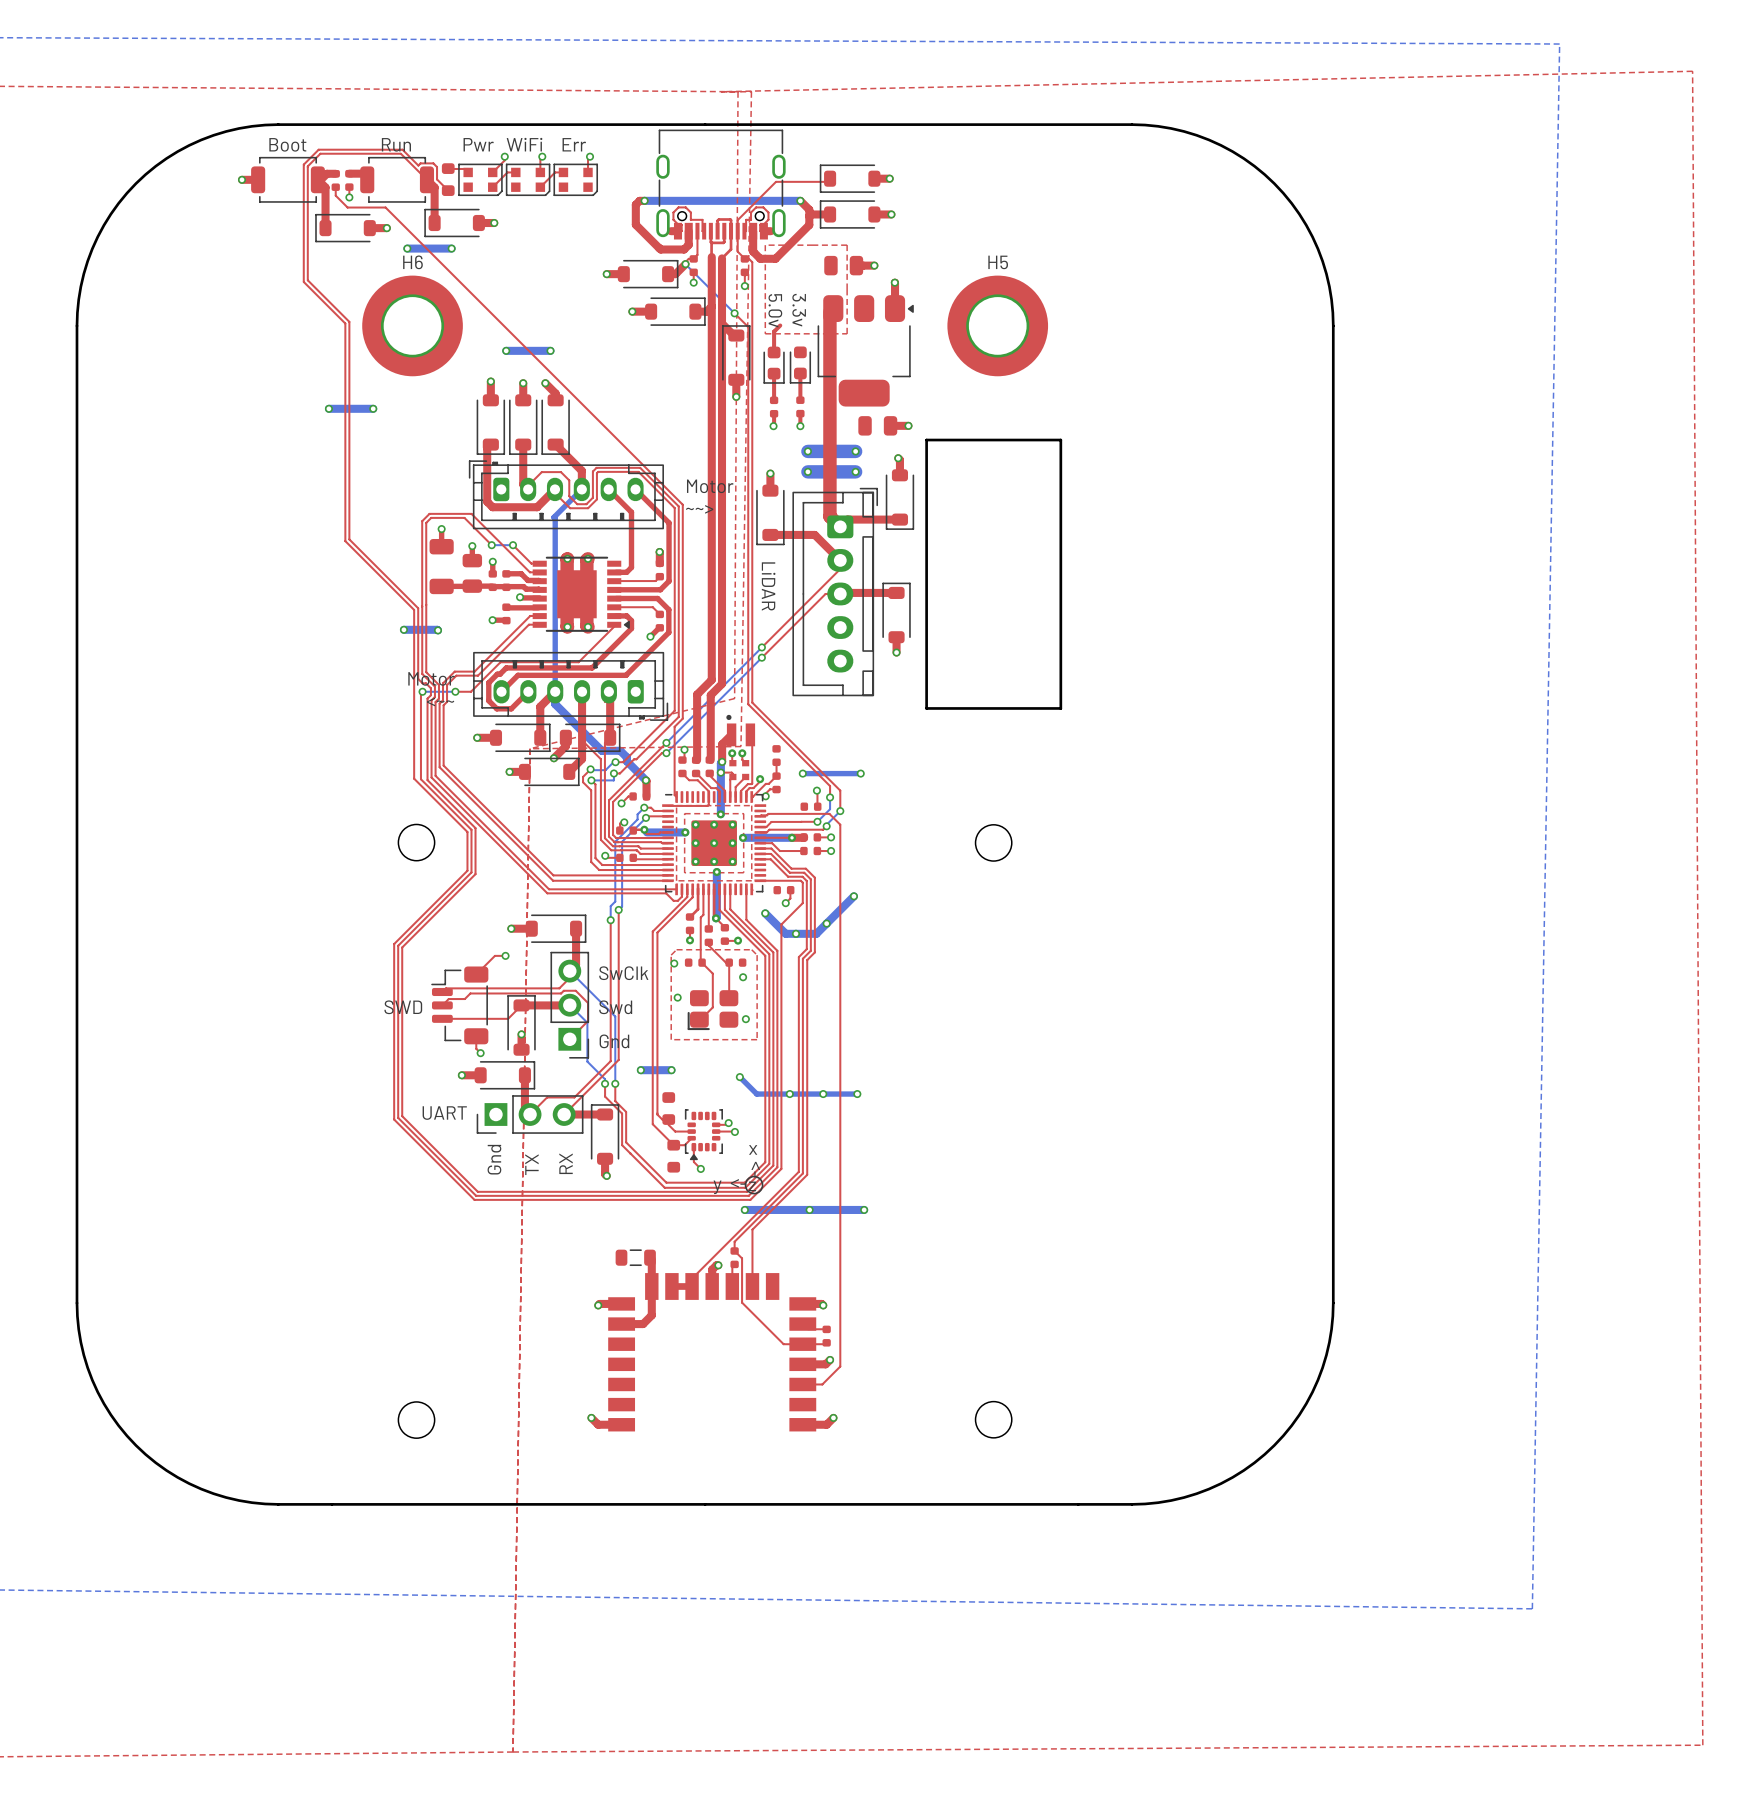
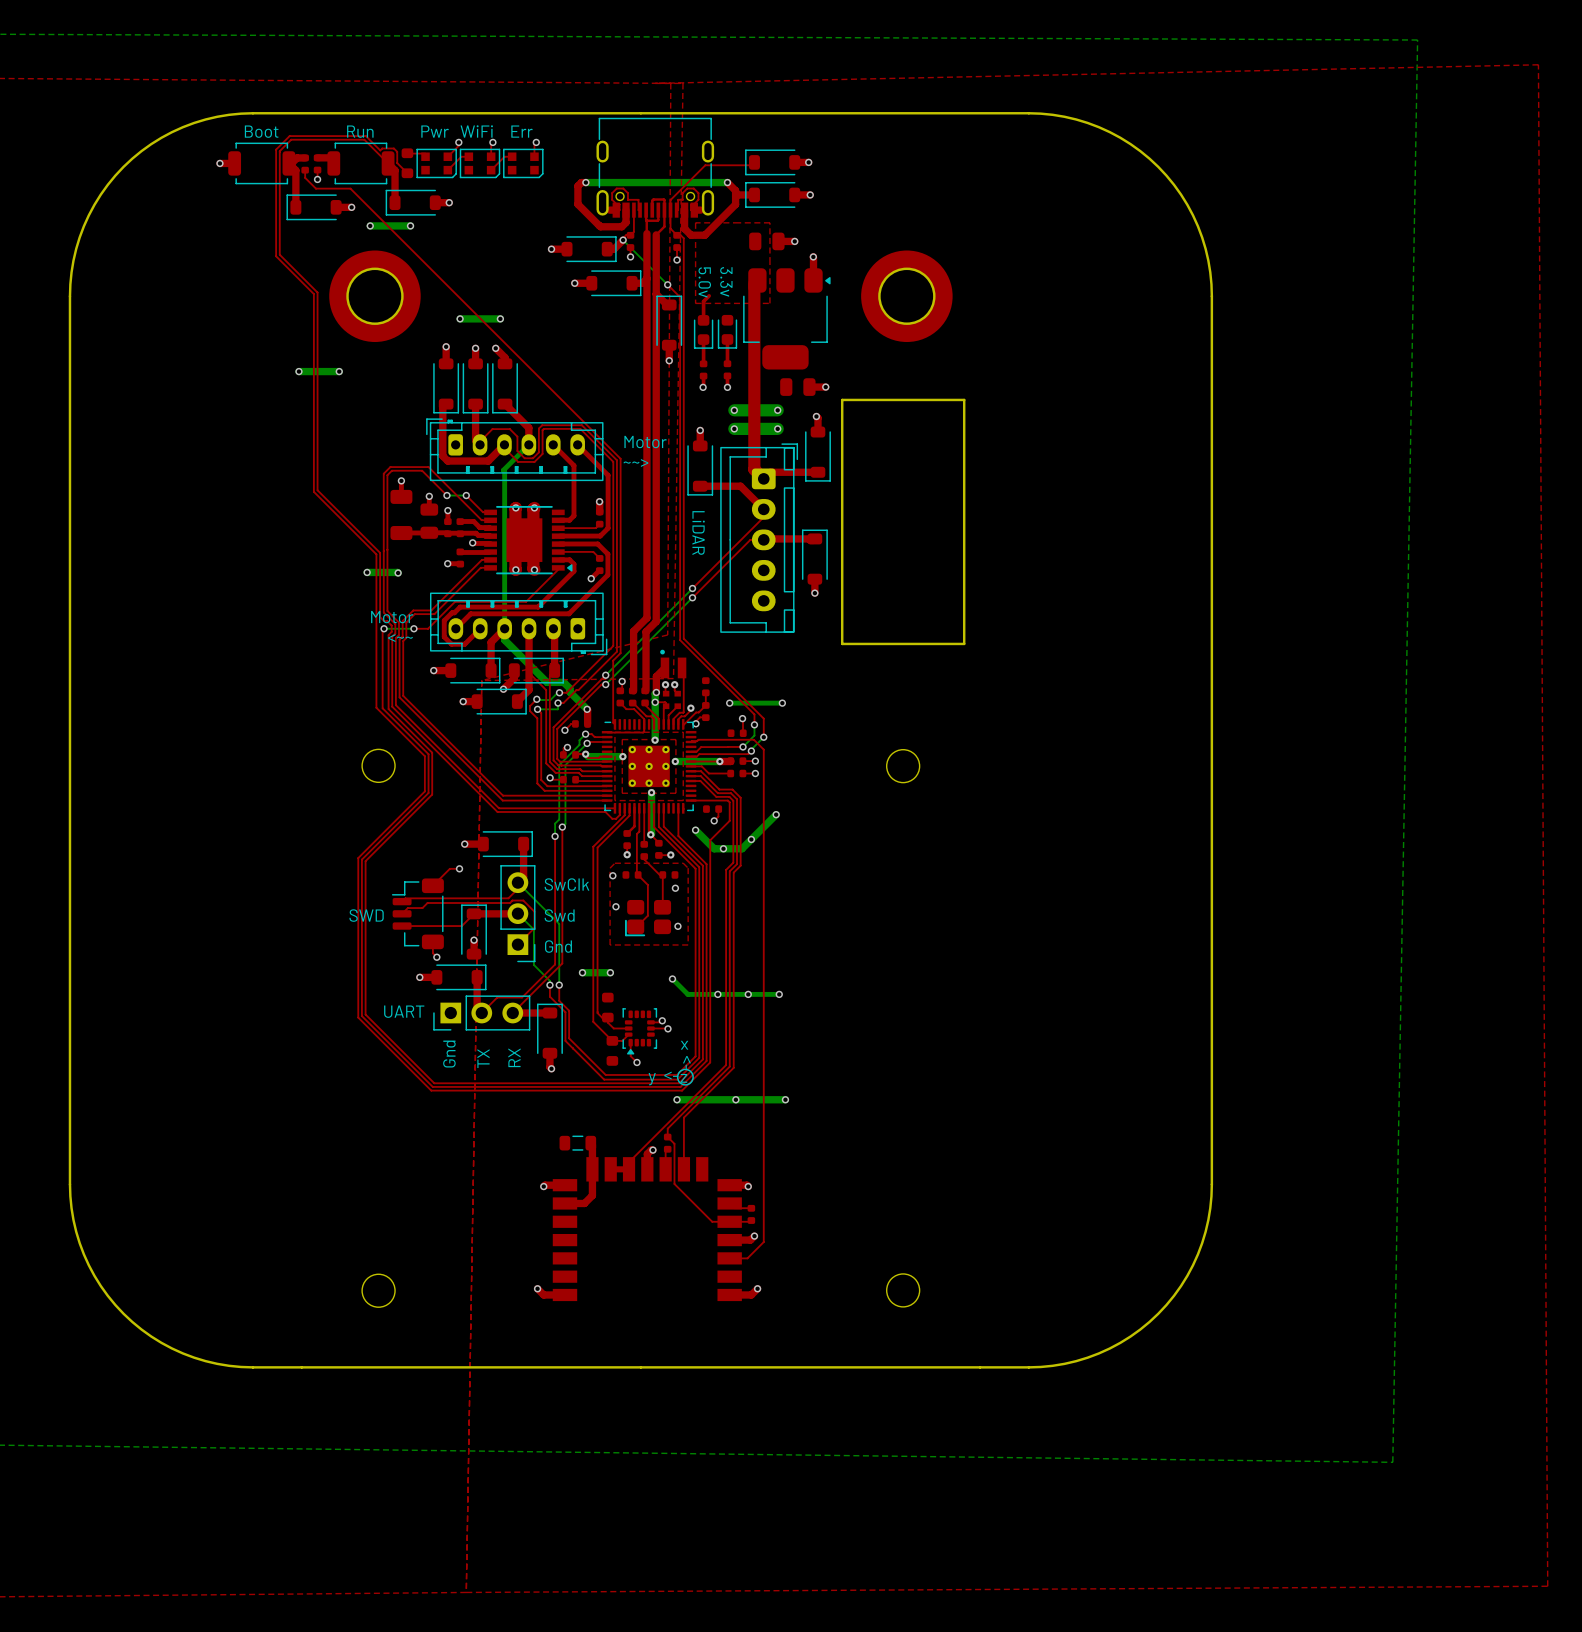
H6 name: H6 (412, 262) -> none
H5 name: H5 (998, 262) -> none

